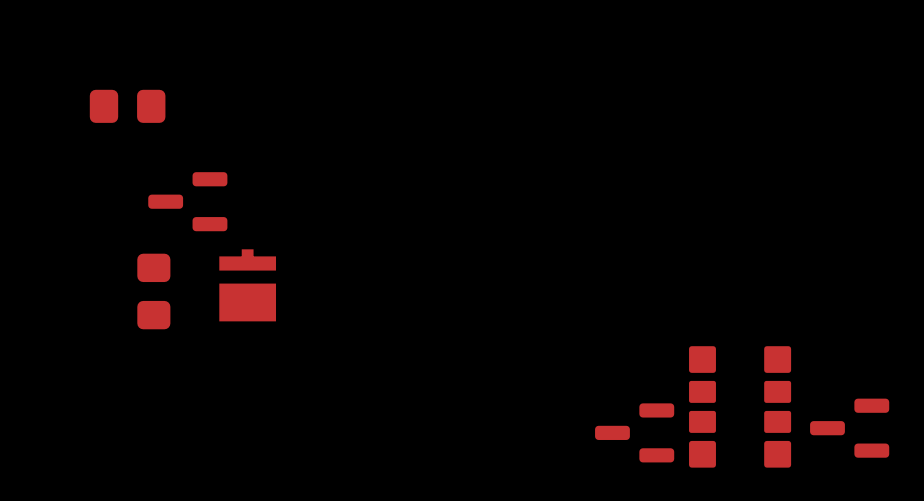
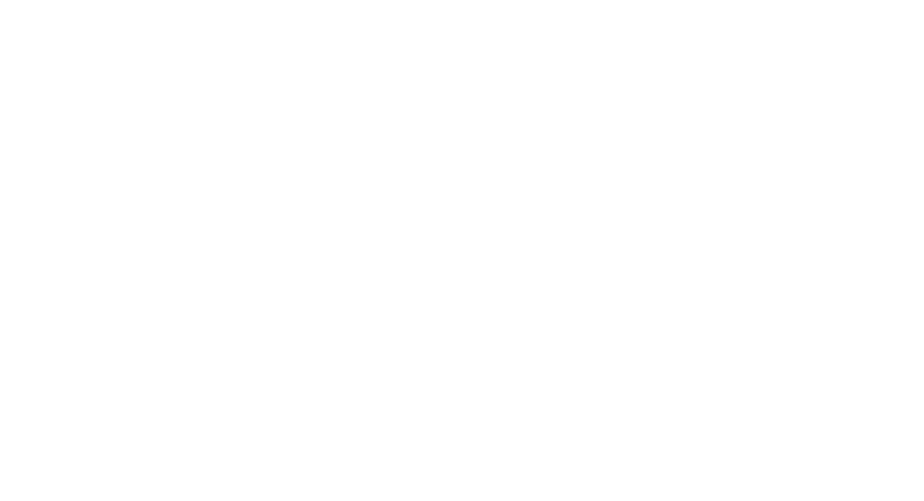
part: (127, 106) -> none
part: (187, 201) -> none
part: (247, 285) -> none
part: (153, 291) -> none
part: (740, 406) -> none
part: (849, 428) -> none
part: (634, 432) -> none

